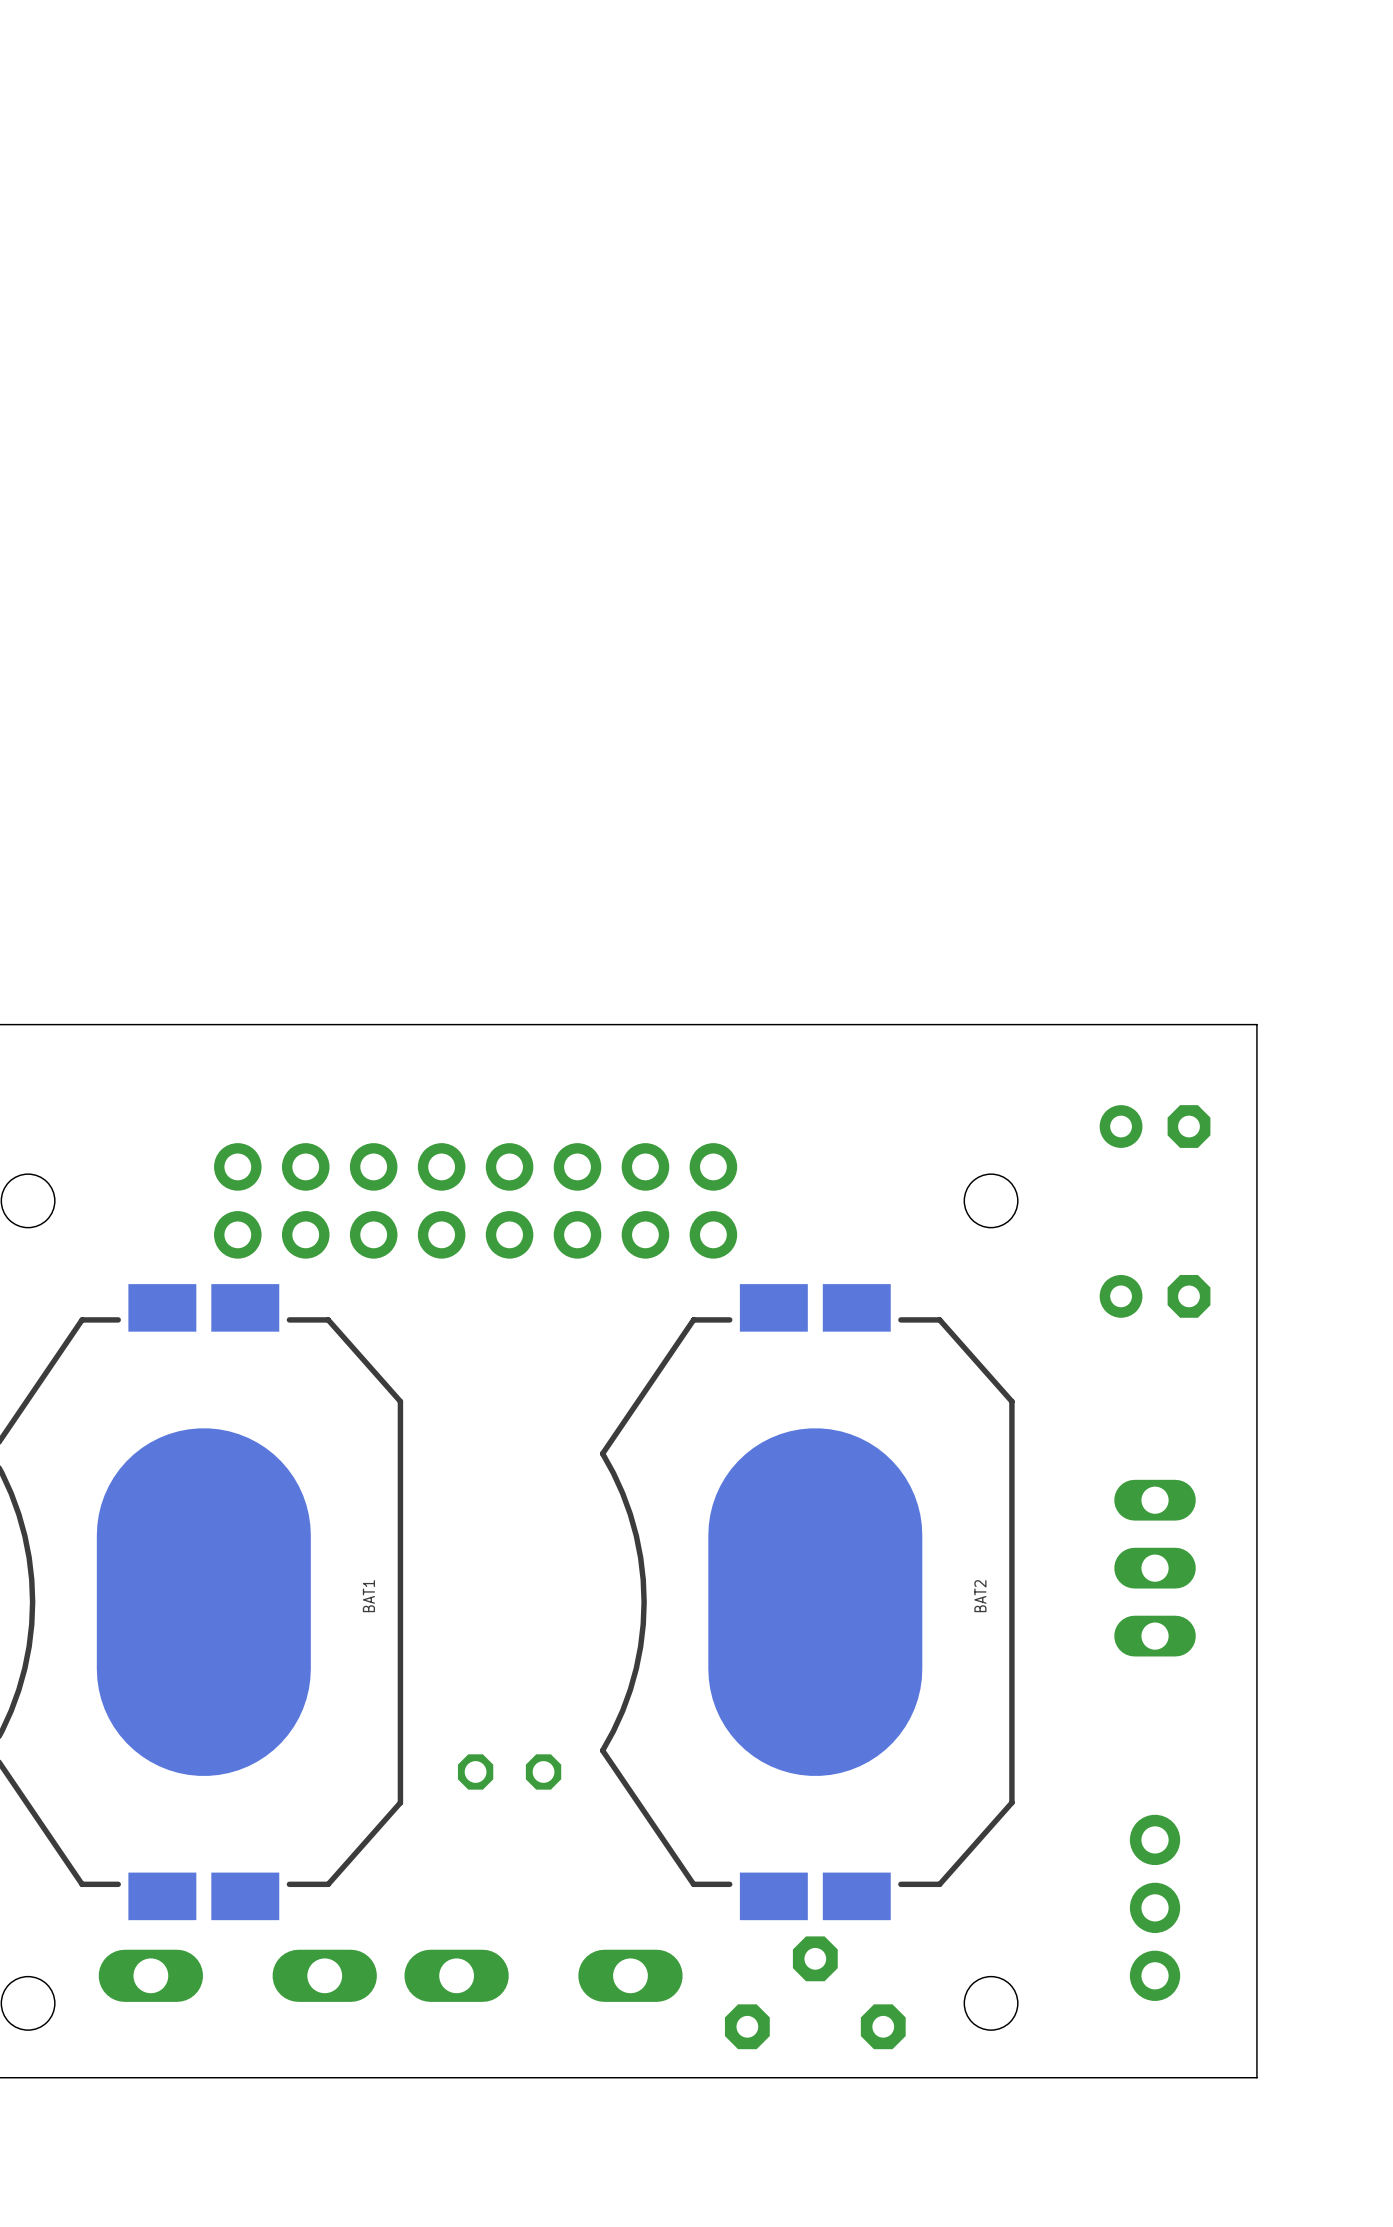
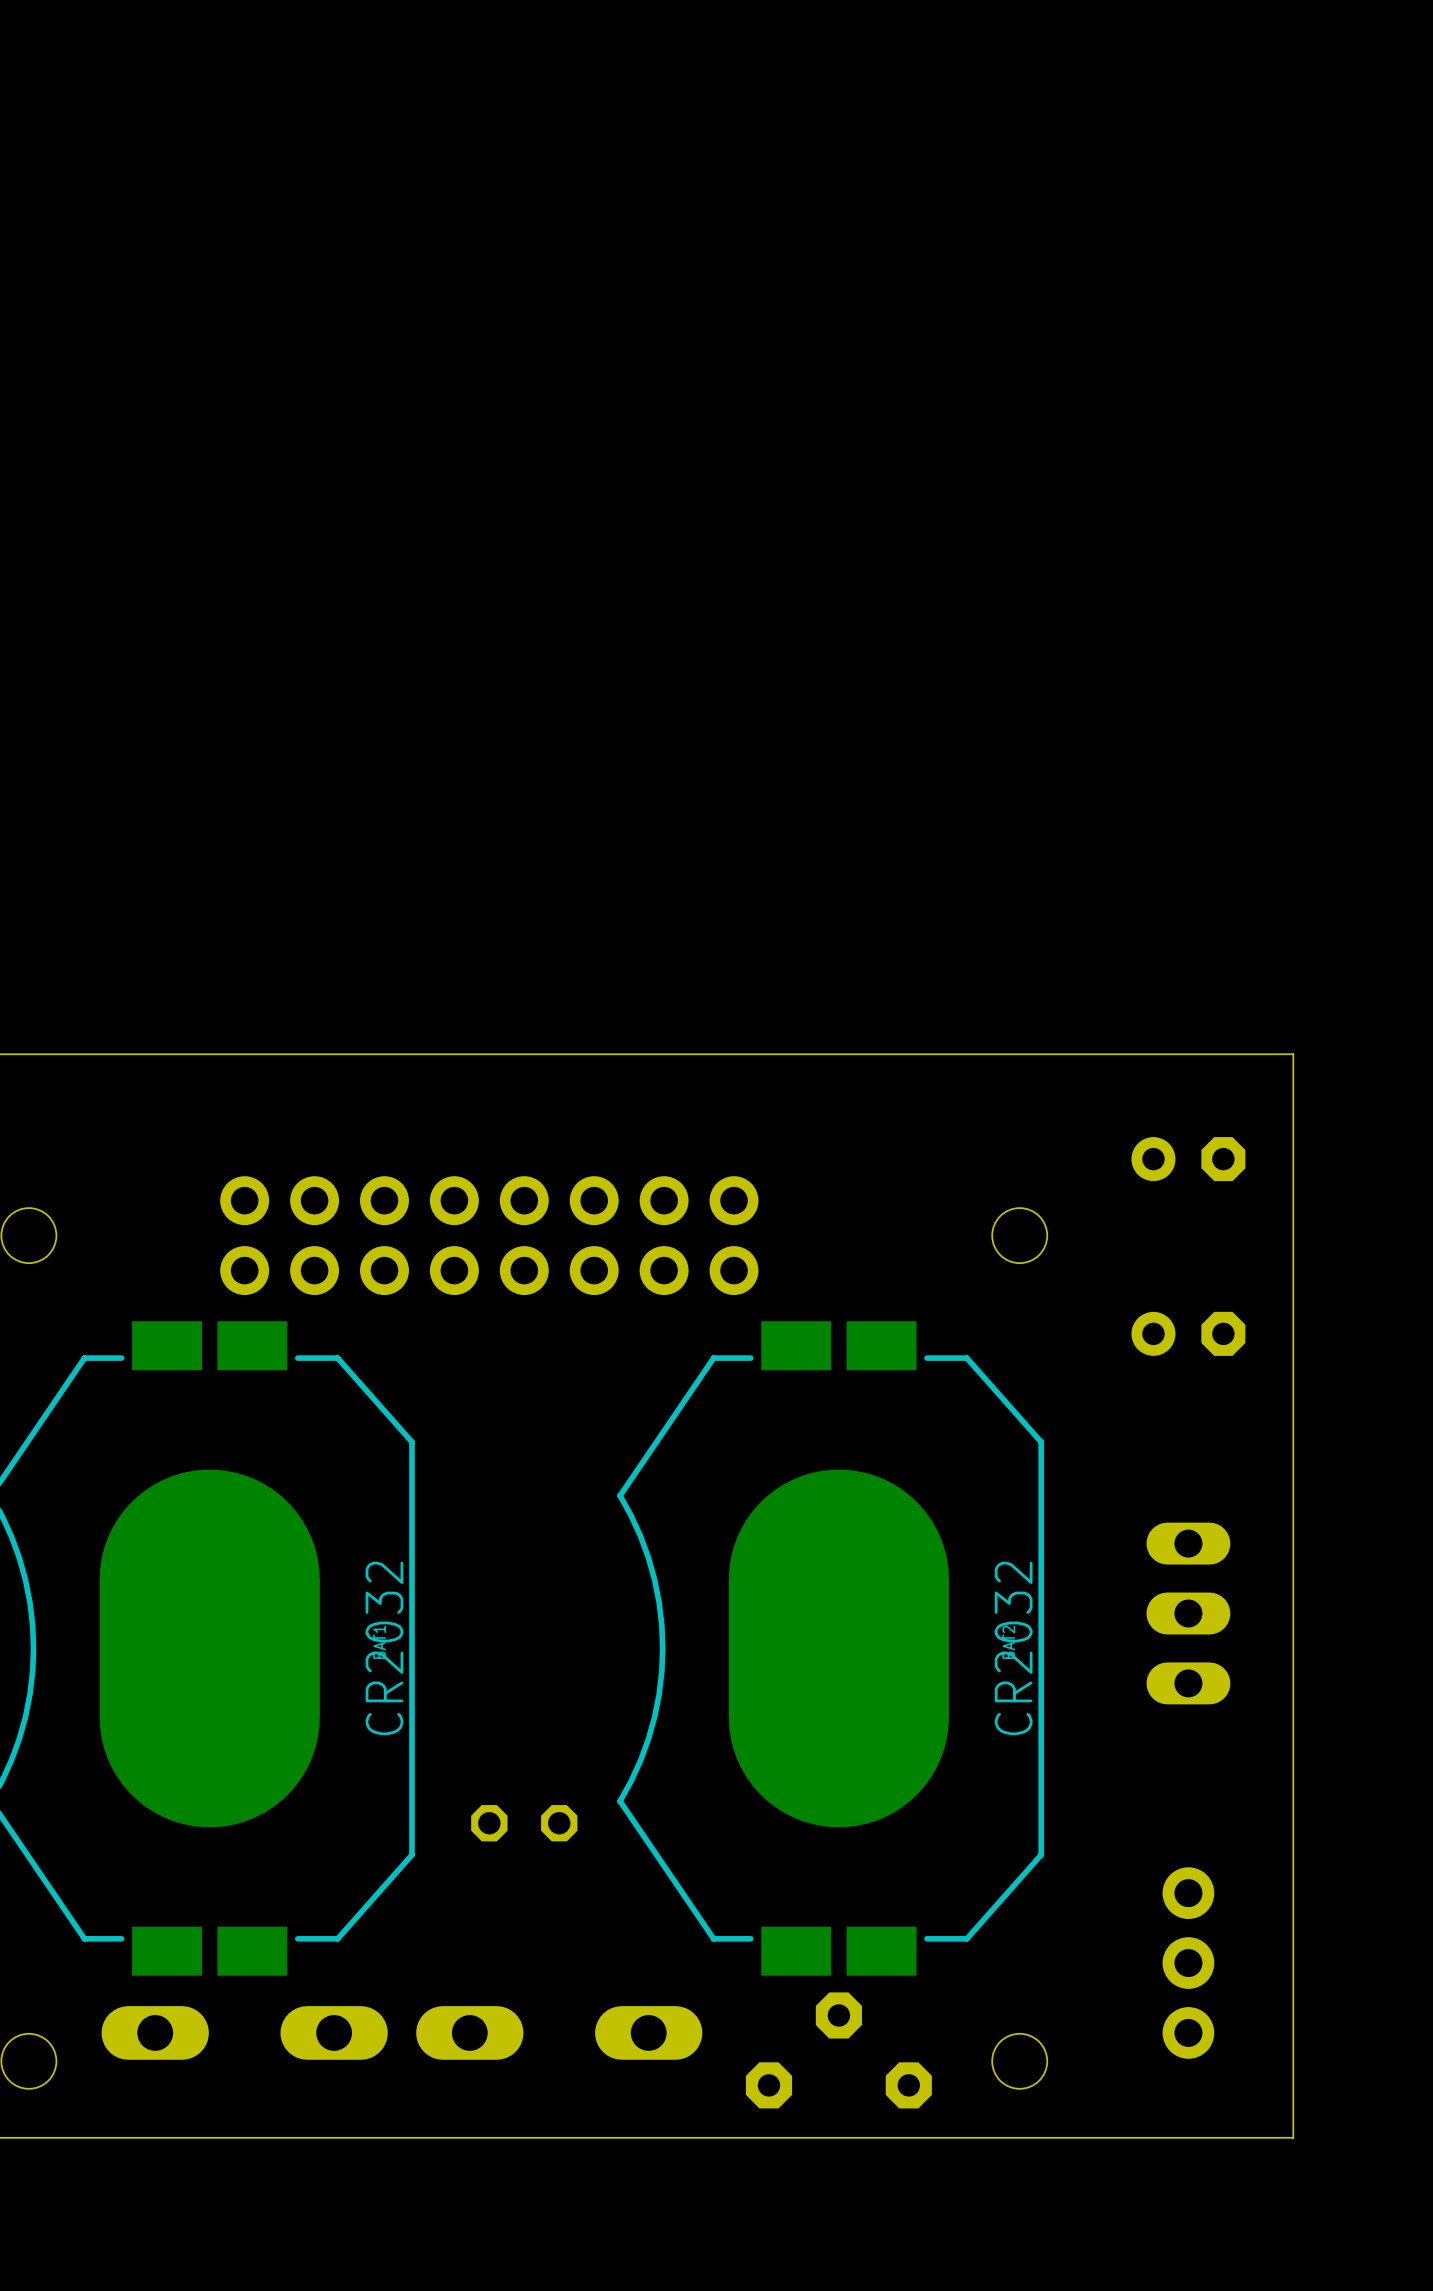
text: none -> CR2032 (384, 1648)
text: none -> CR2032 (1013, 1648)

